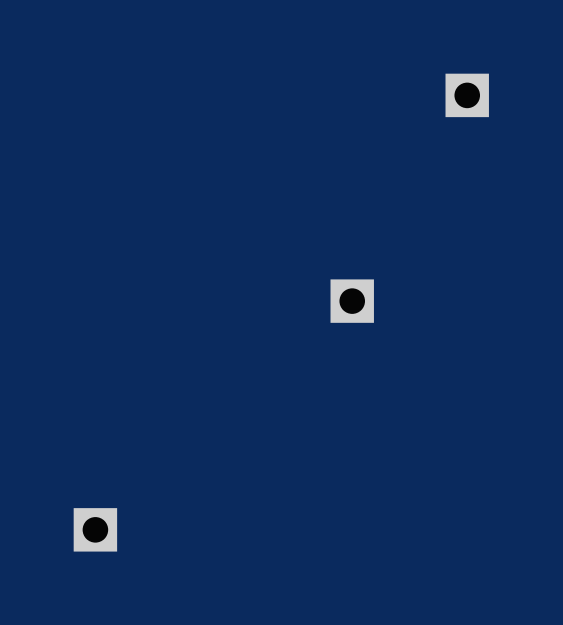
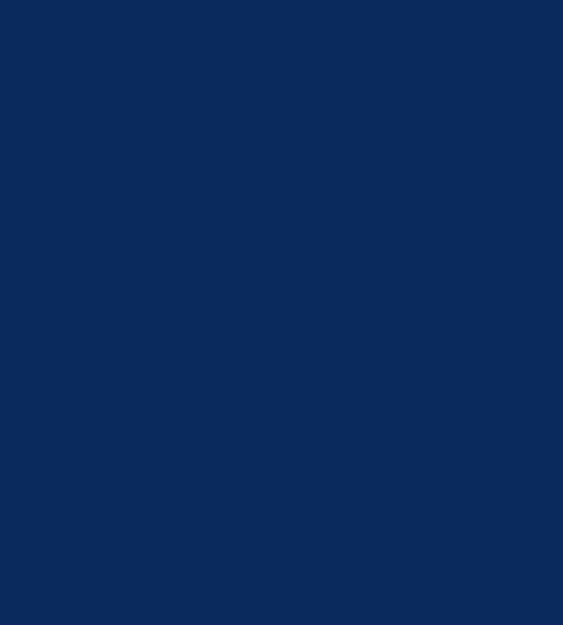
part: (467, 95) -> none
part: (352, 301) -> none
part: (95, 529) -> none

